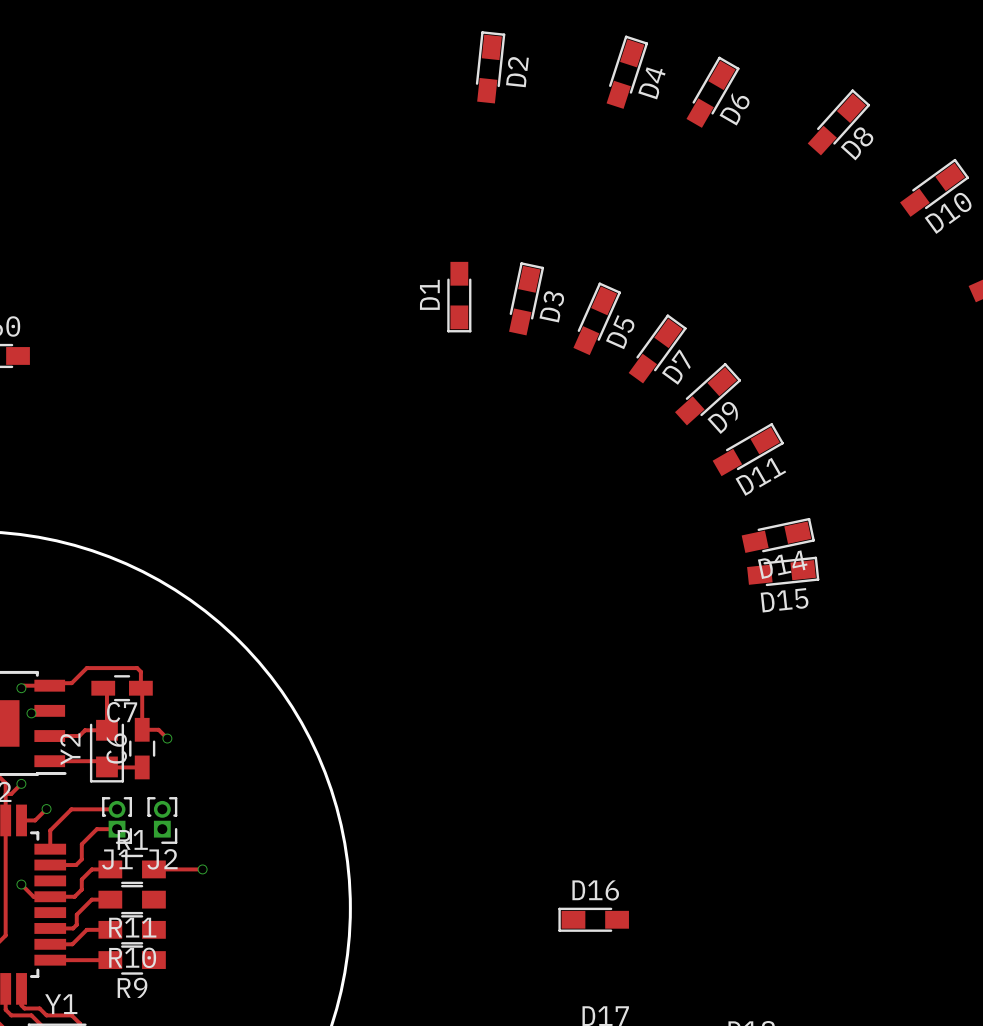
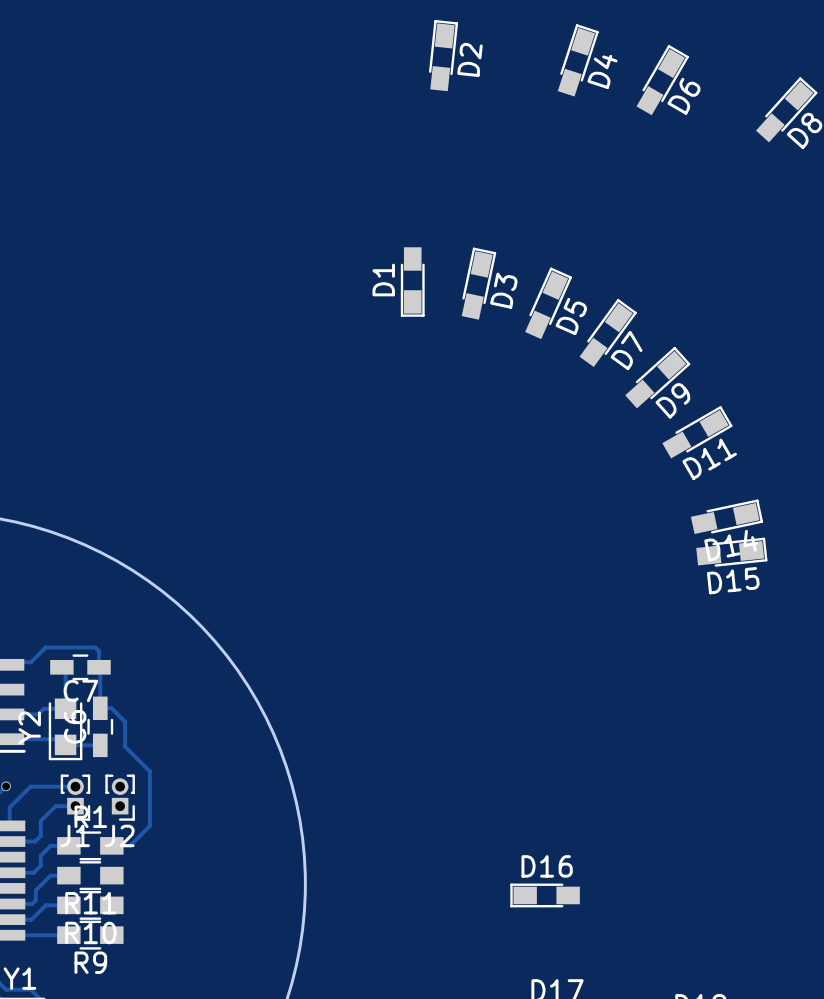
track: (153, 729) (158, 729) (167, 738) -> (111, 708) (125, 721) (125, 746) (149, 771) (149, 826) (130, 845)
via: (167, 738) -> none
track: (172, 869) (202, 869) -> none
via: (202, 869) -> none

